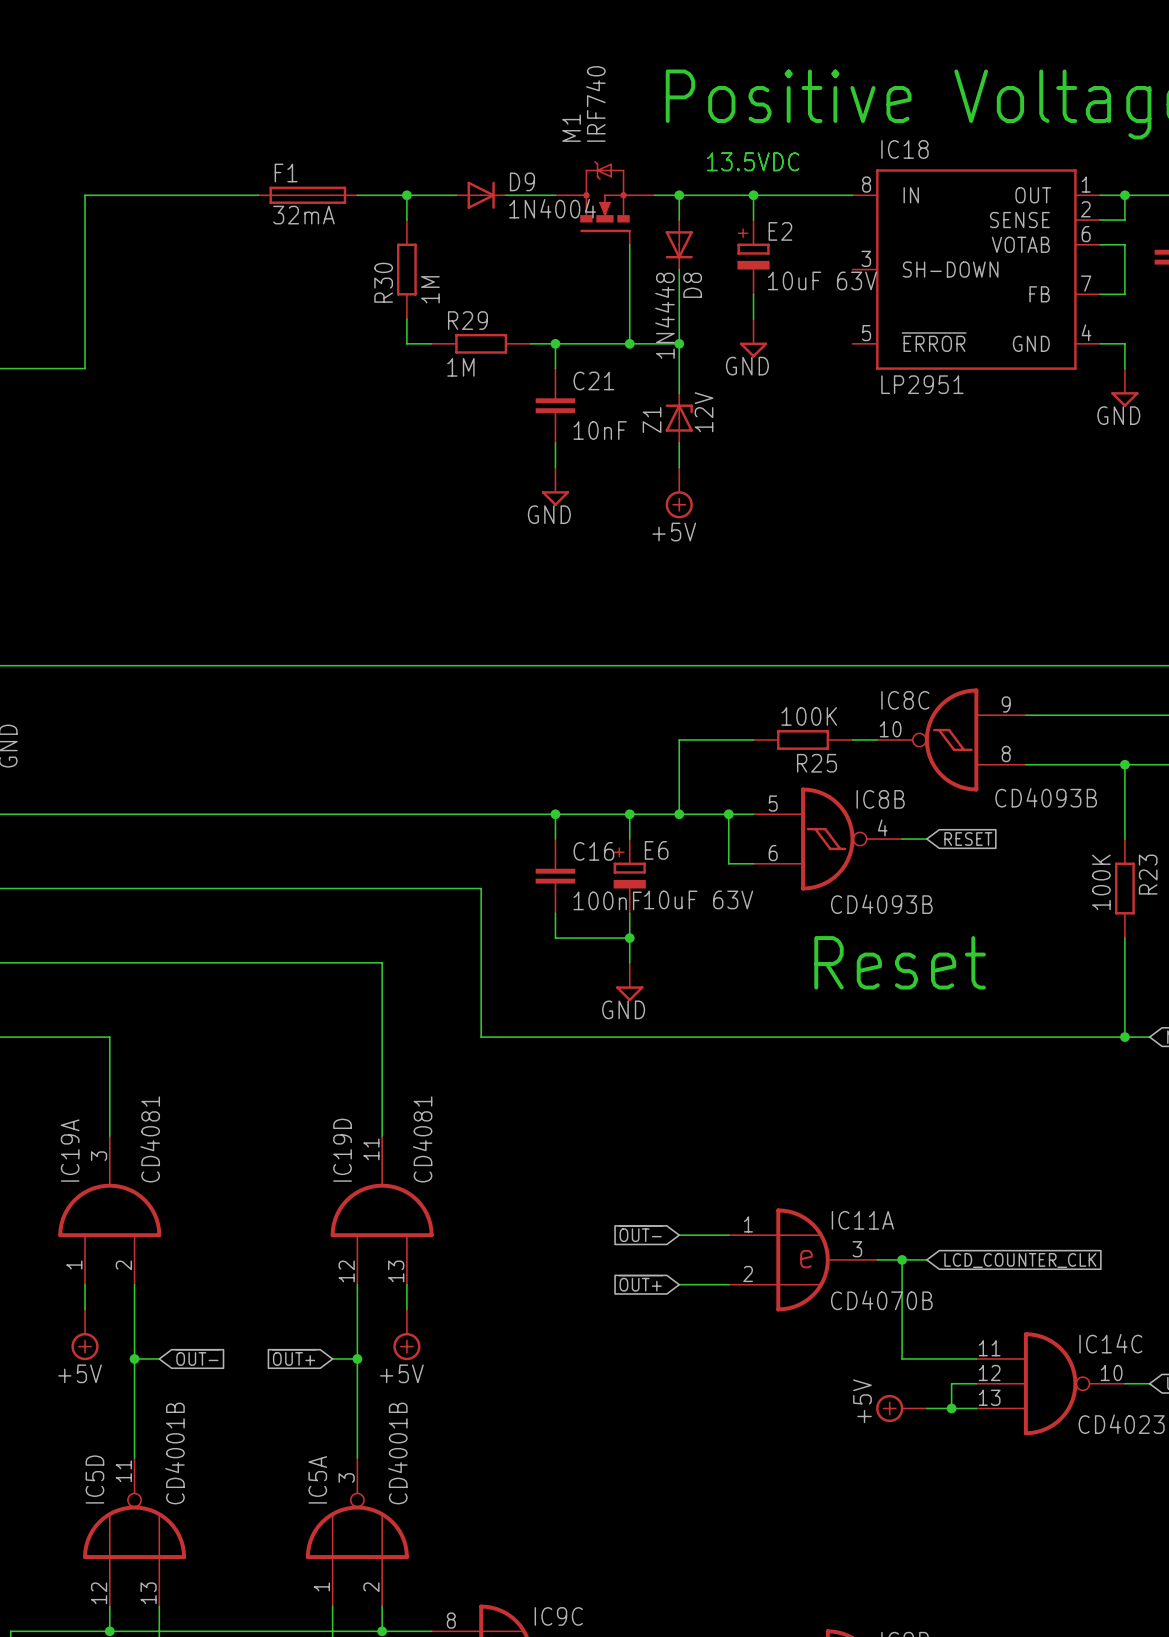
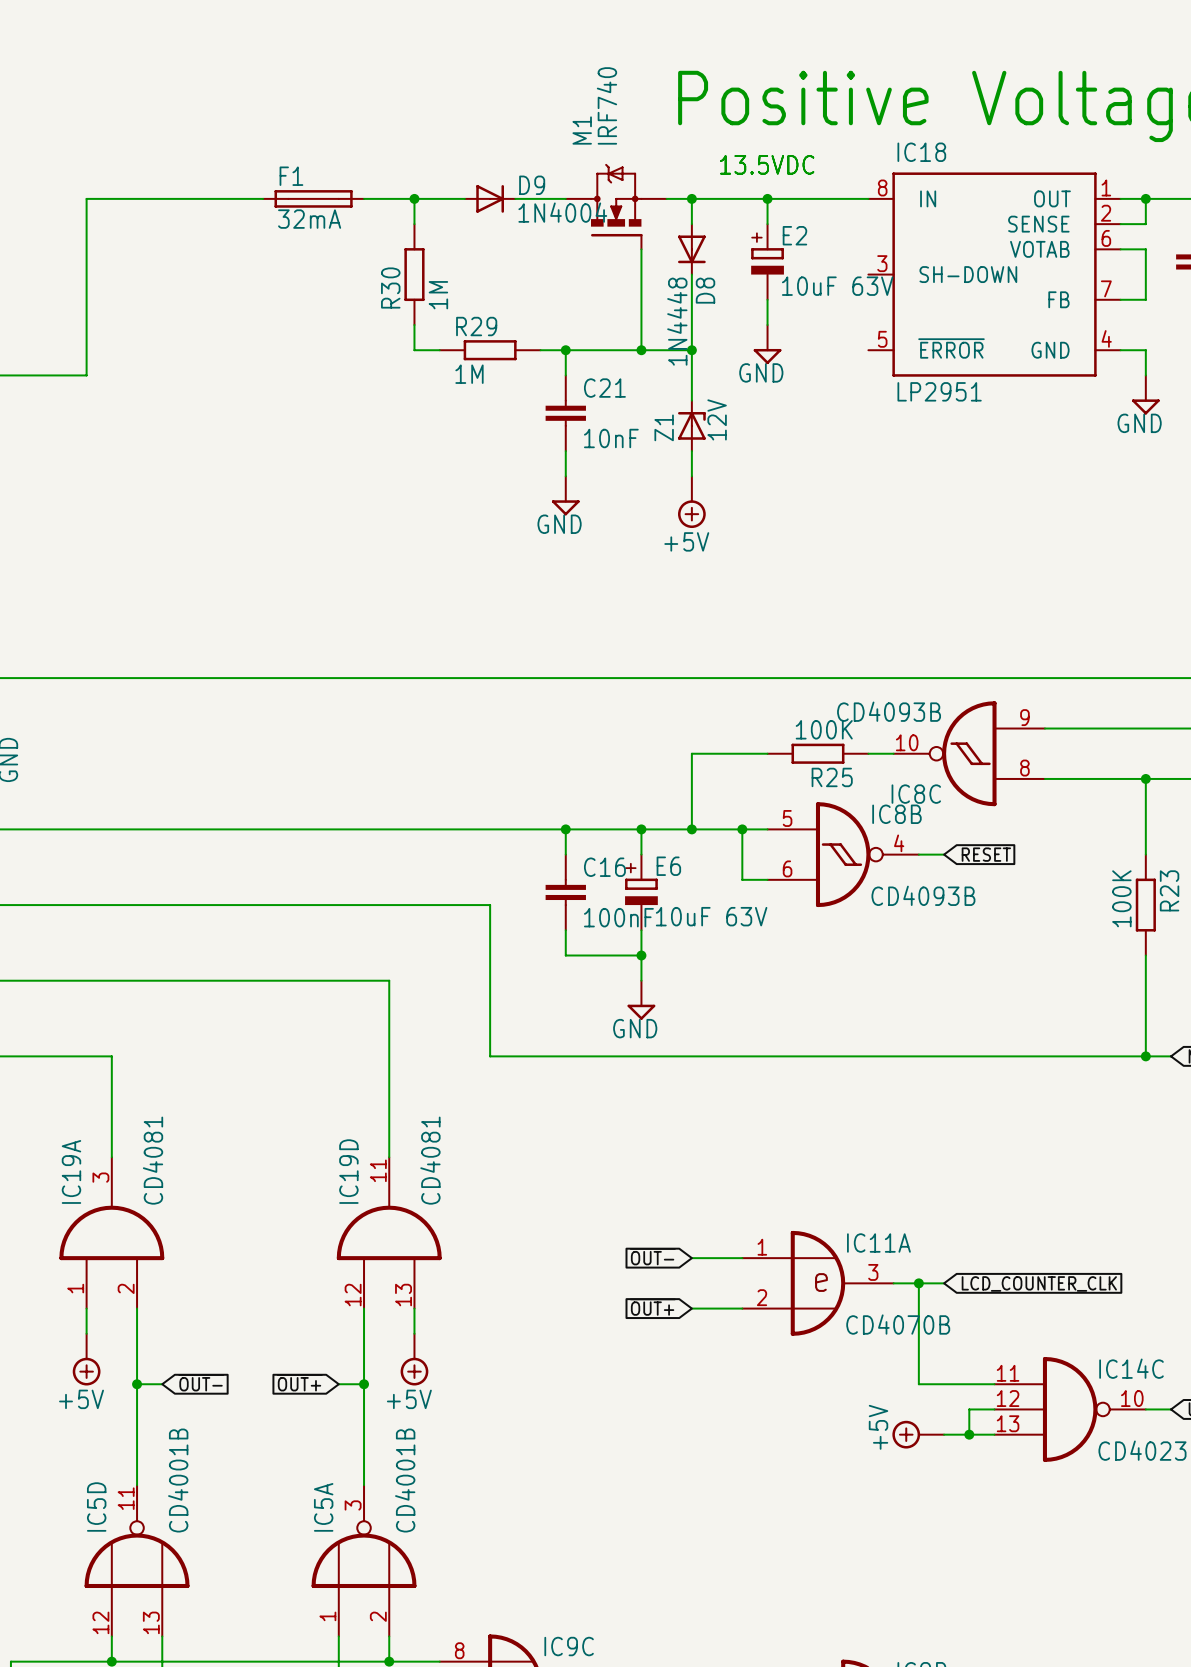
IC8C name position: IC8C (905, 700) -> IC8C (916, 794)
IC8C value position: CD4093B (1046, 797) -> CD4093B (889, 711)
IC8B value position: CD4093B (881, 904) -> CD4093B (923, 895)
text: Reset (900, 962) -> none

